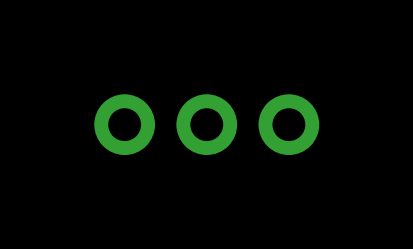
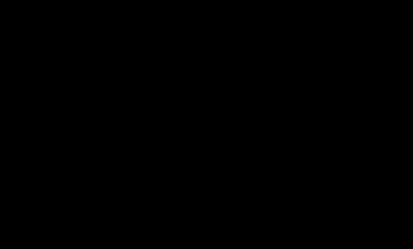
part: (206, 124) -> none

